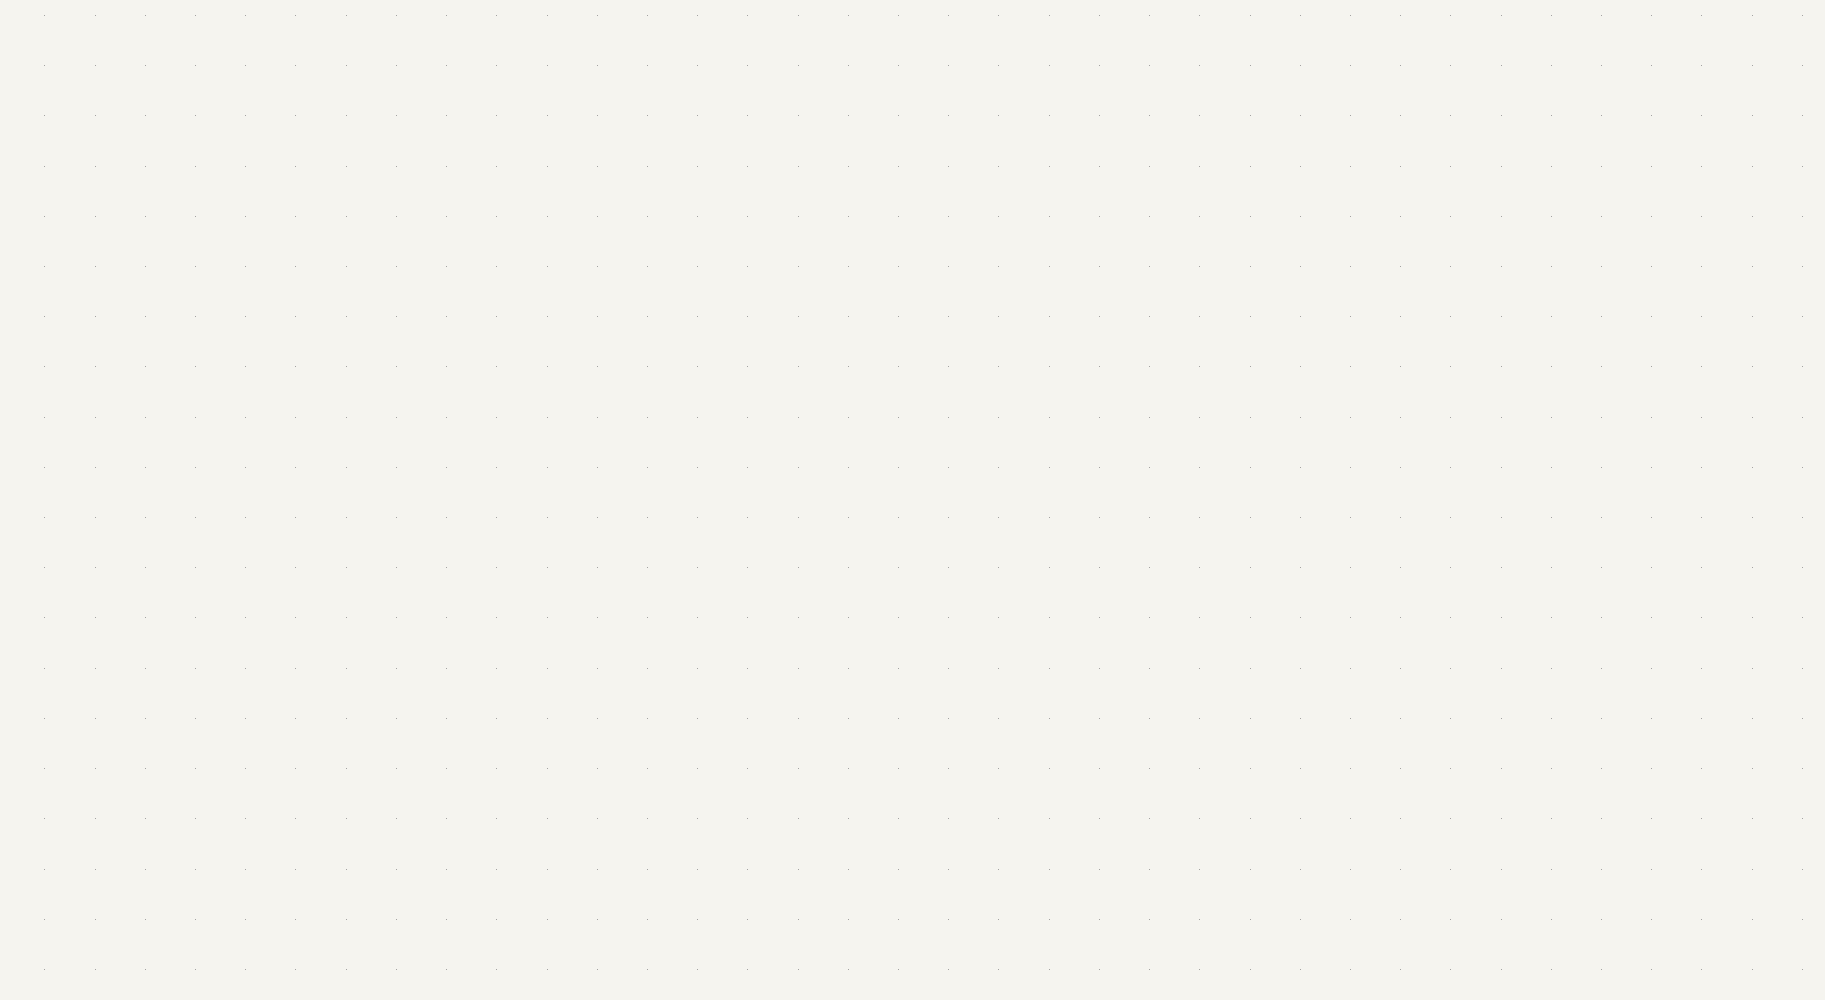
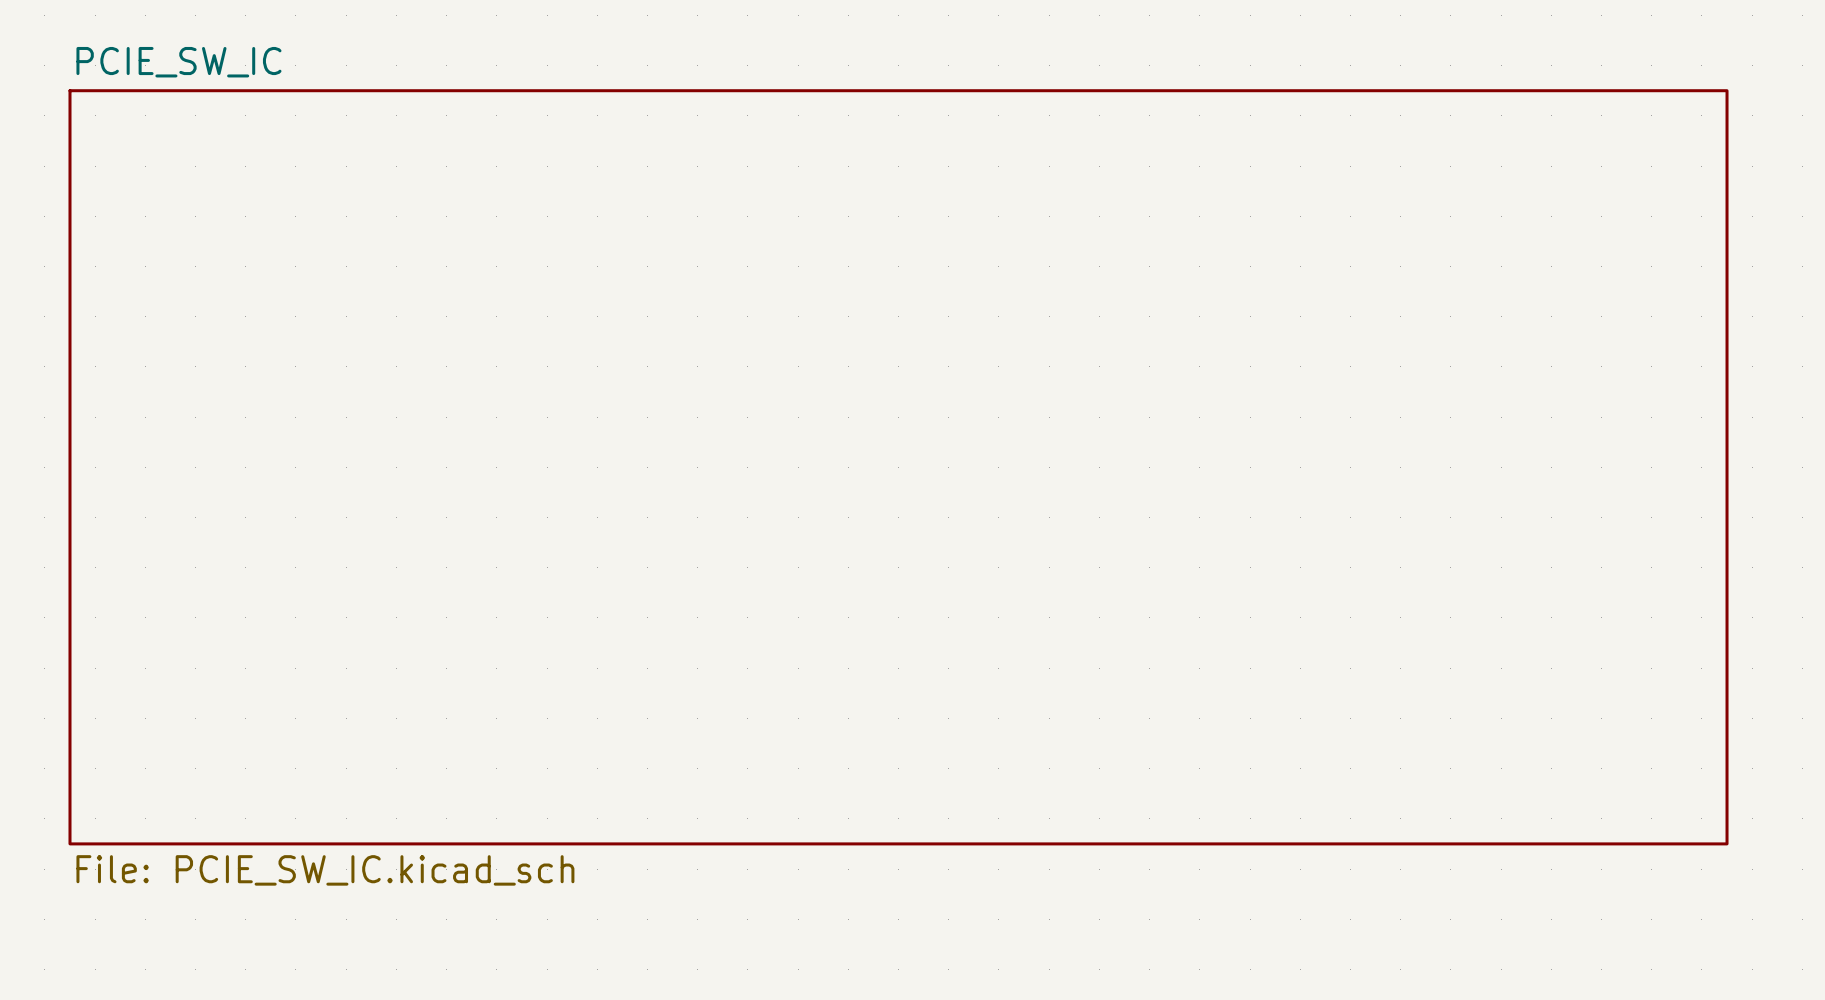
sheet PCIE_SW_IC: none -> File: PCIE_SW_IC.kicad_sch (898, 467)

